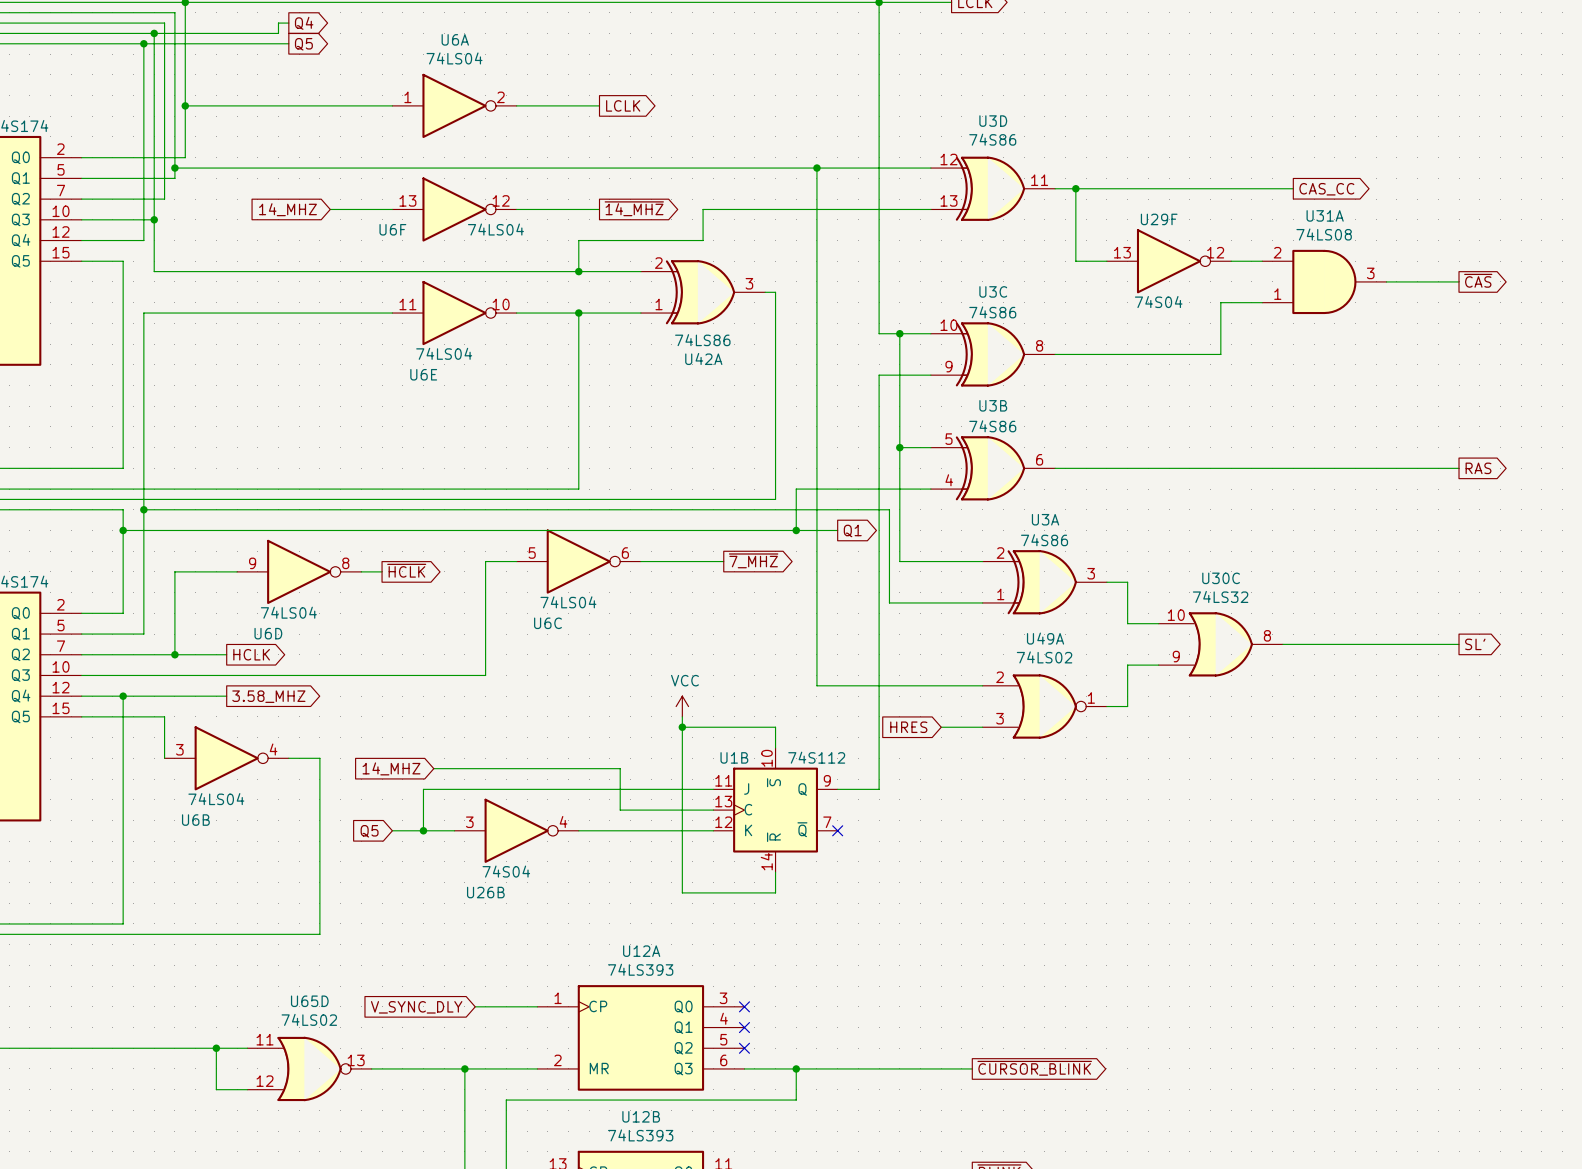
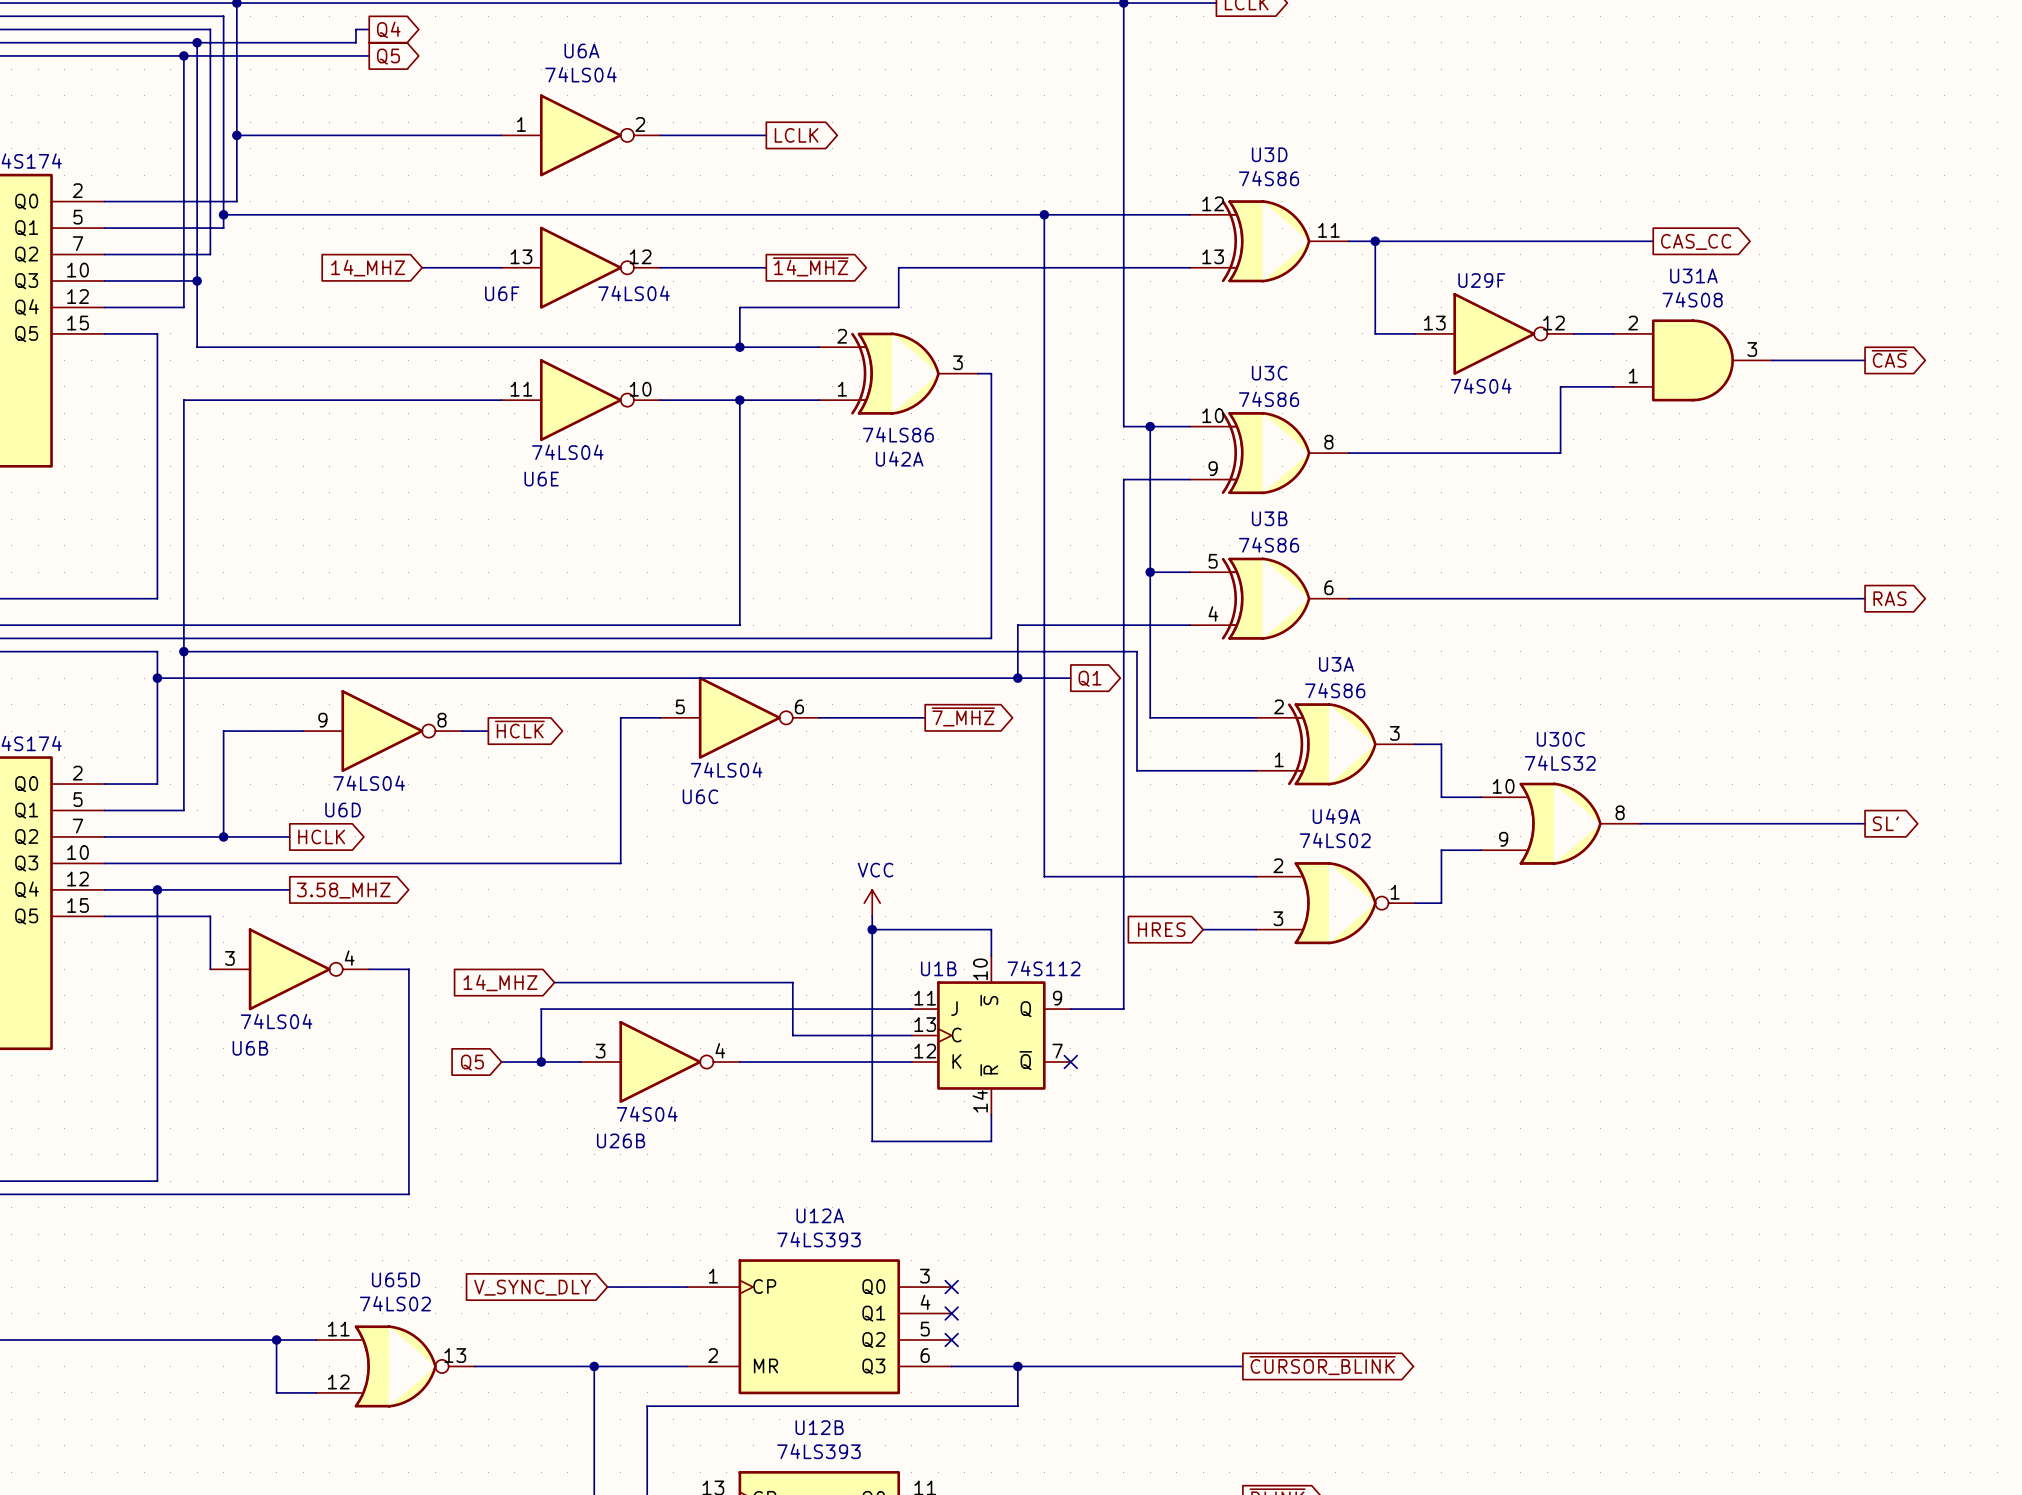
U31A value: 74LS08 (1324, 234) -> 74S08 (1692, 299)

